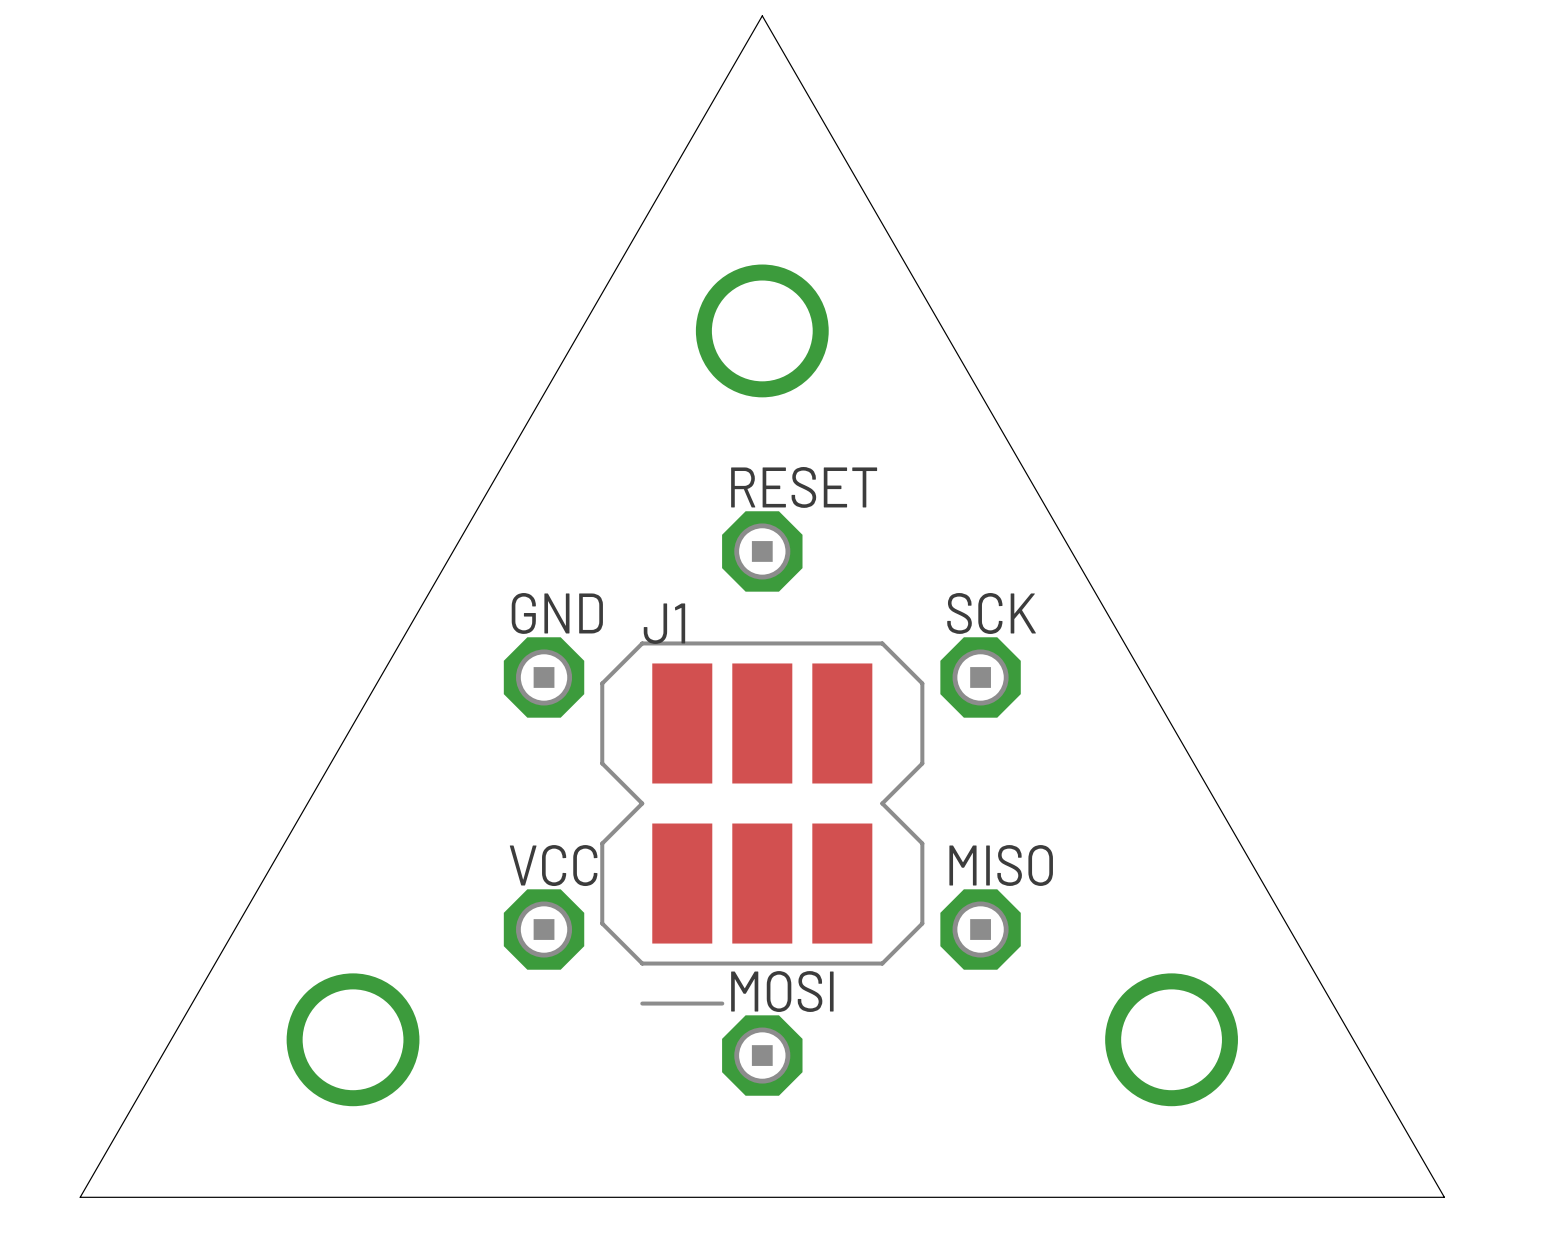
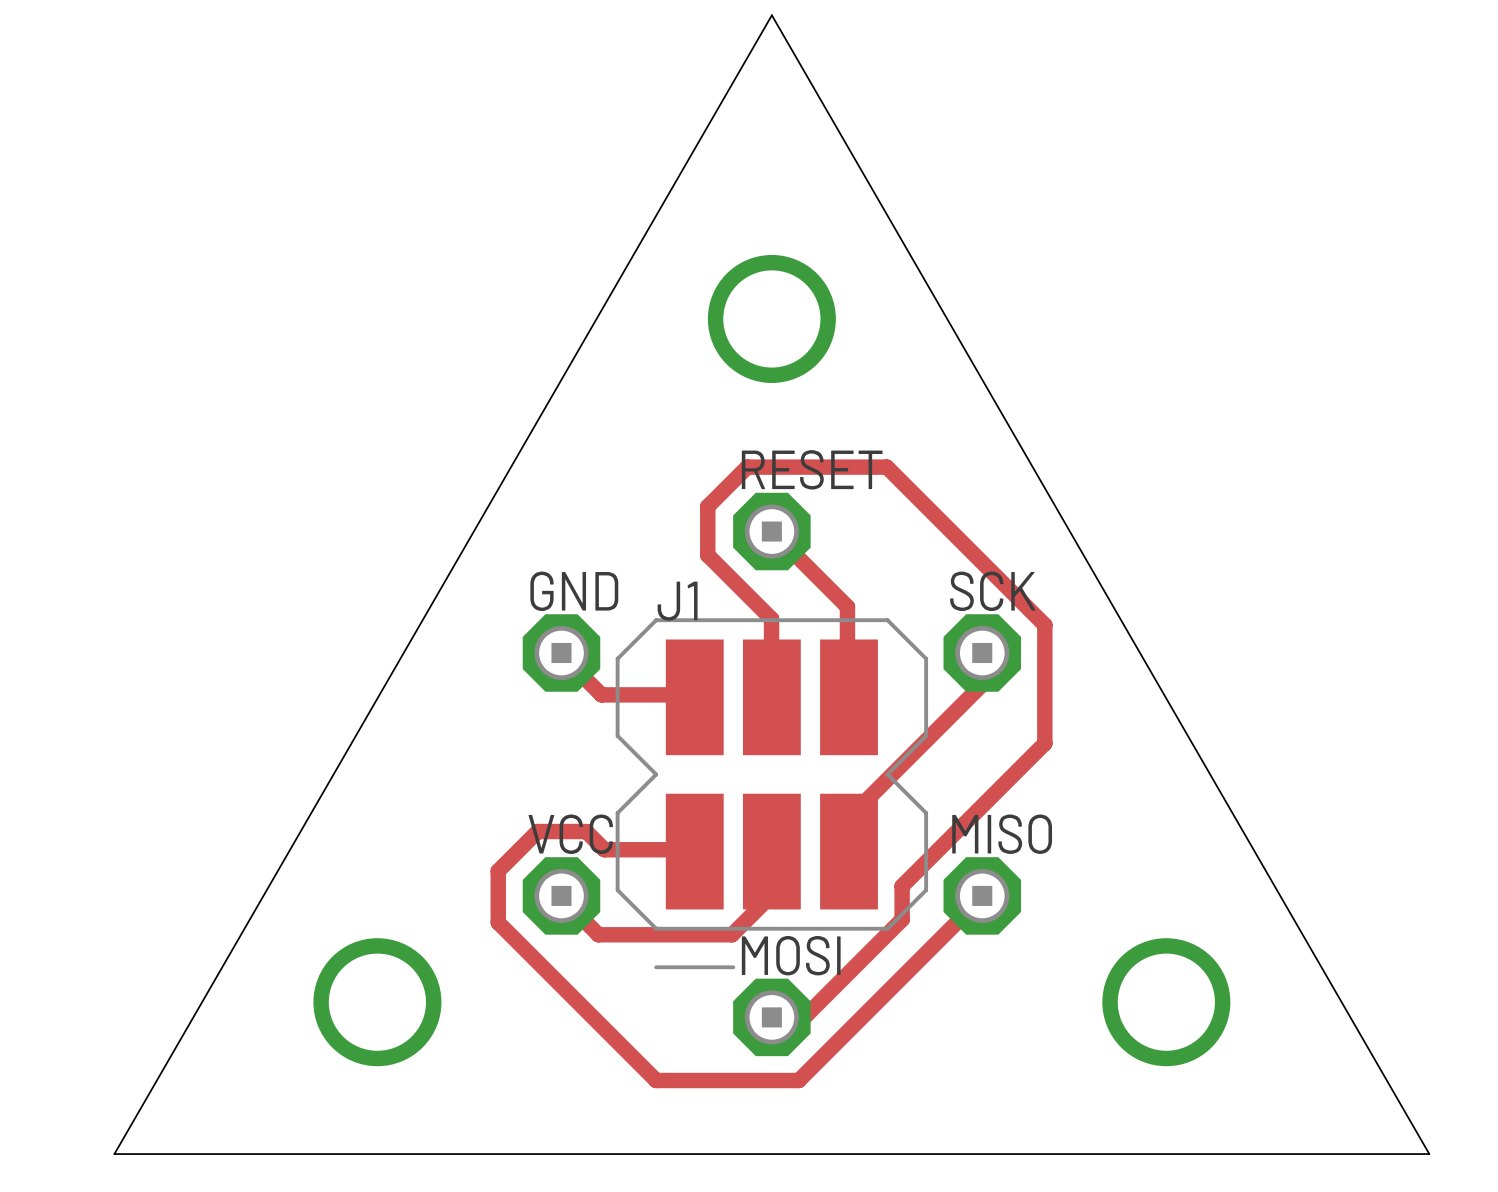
top track: none -> (771, 531) (847, 606) (847, 694) (849, 697)
top track: none -> (561, 653) (601, 694) (692, 694) (694, 697)
top track: none -> (982, 653) (981, 685) (850, 816) (849, 851)
top track: none -> (771, 697) (771, 618) (707, 555) (707, 506) (747, 467) (886, 467) (1044, 625) (1044, 743) (902, 886) (902, 919) (804, 1016) (771, 1017)
top track: none -> (694, 851) (692, 849) (604, 849) (586, 831) (537, 831) (498, 870) (498, 922) (656, 1080) (798, 1080) (982, 895)
top track: none -> (771, 851) (771, 895) (732, 934) (598, 934) (561, 895)

